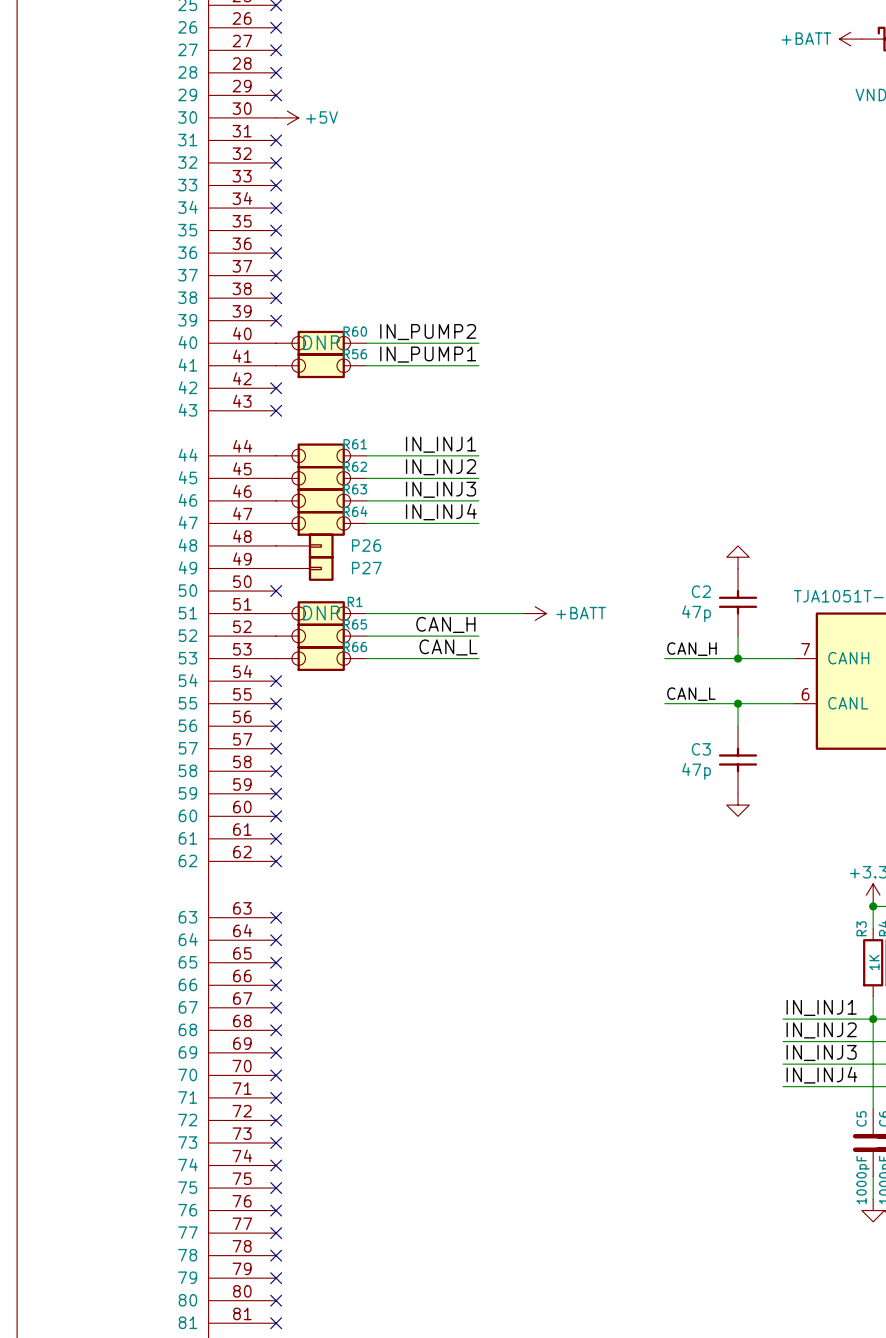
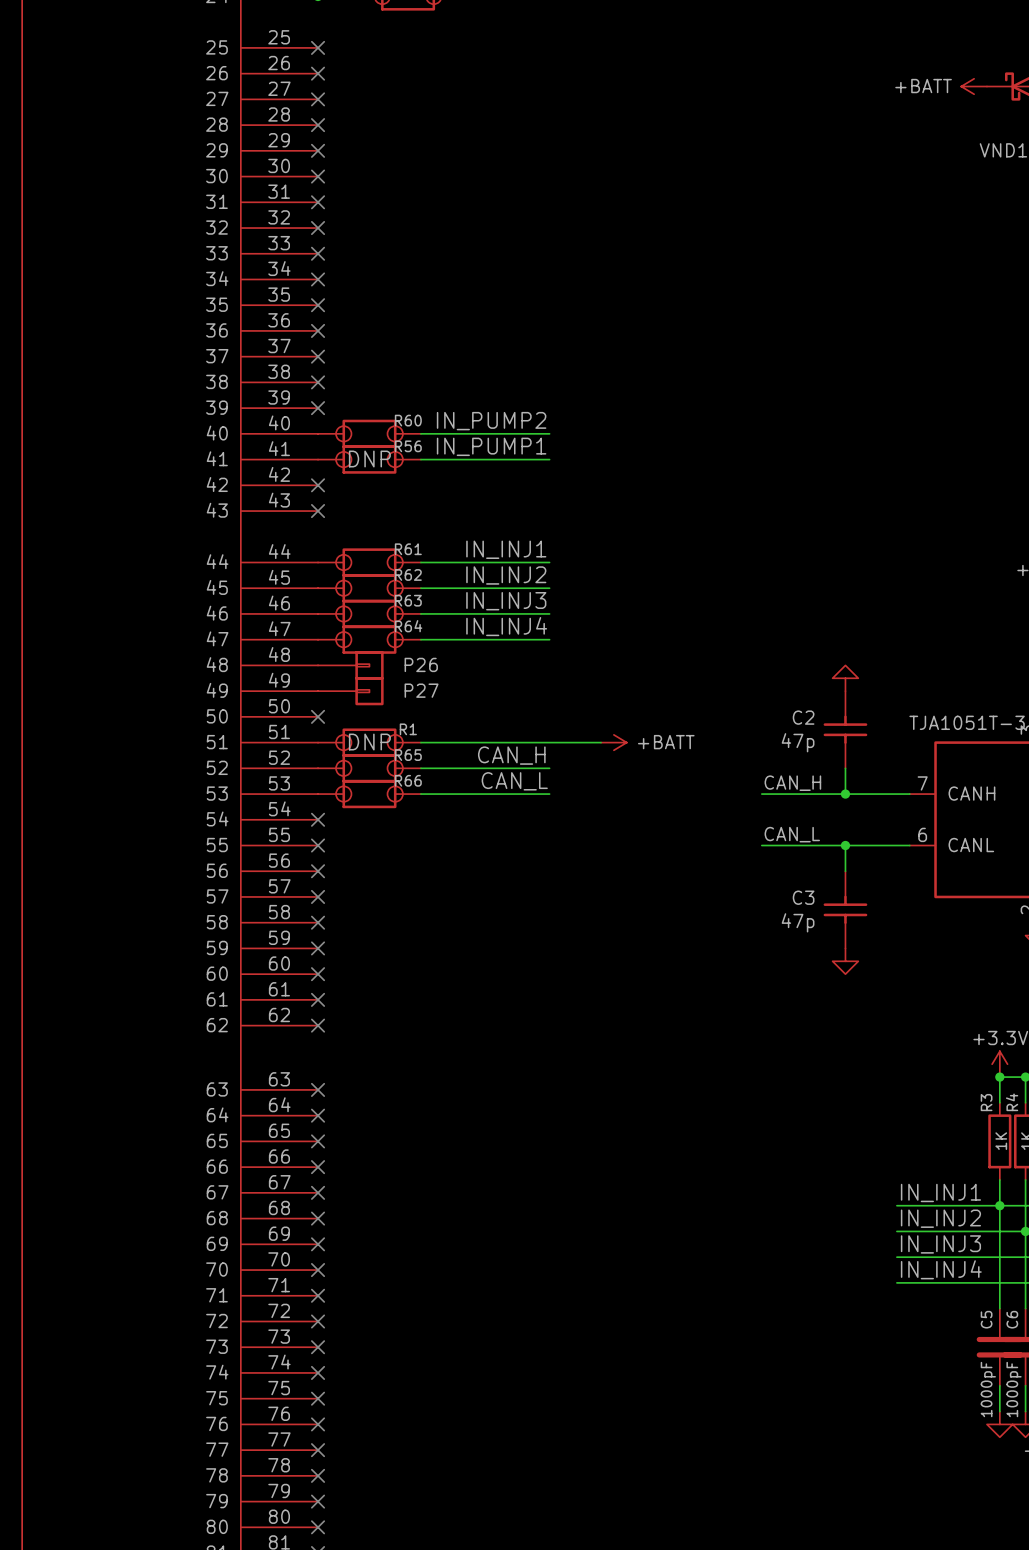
no-connect mark: none -> (318, 176)
power symbol: +5V (287, 117) -> none
R60 text: DNP (321, 342) -> none
R56 text: none -> DNP (369, 459)

